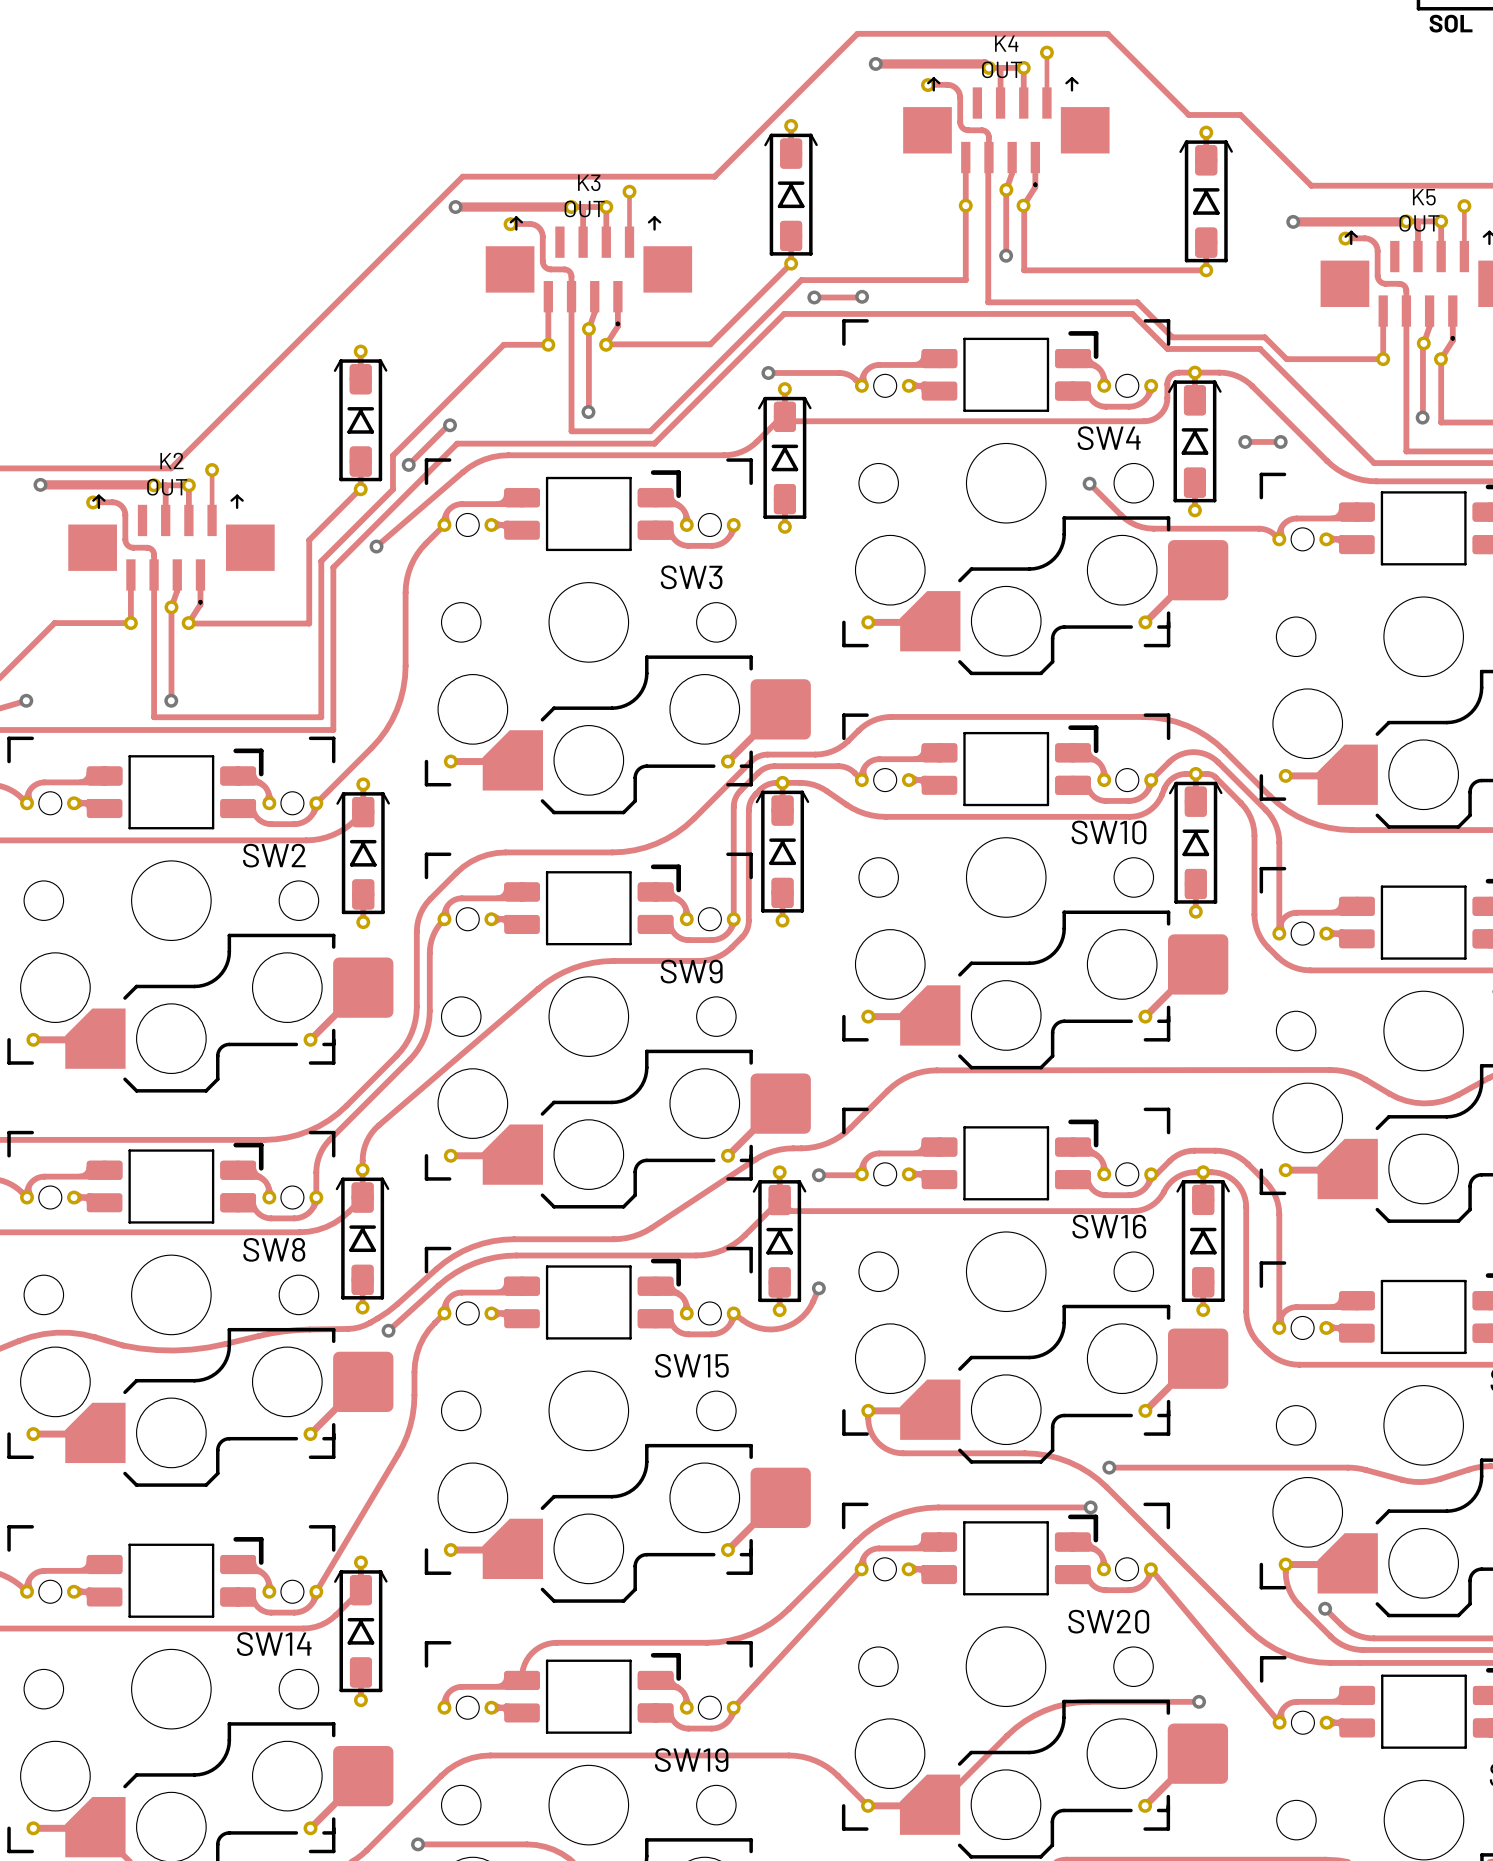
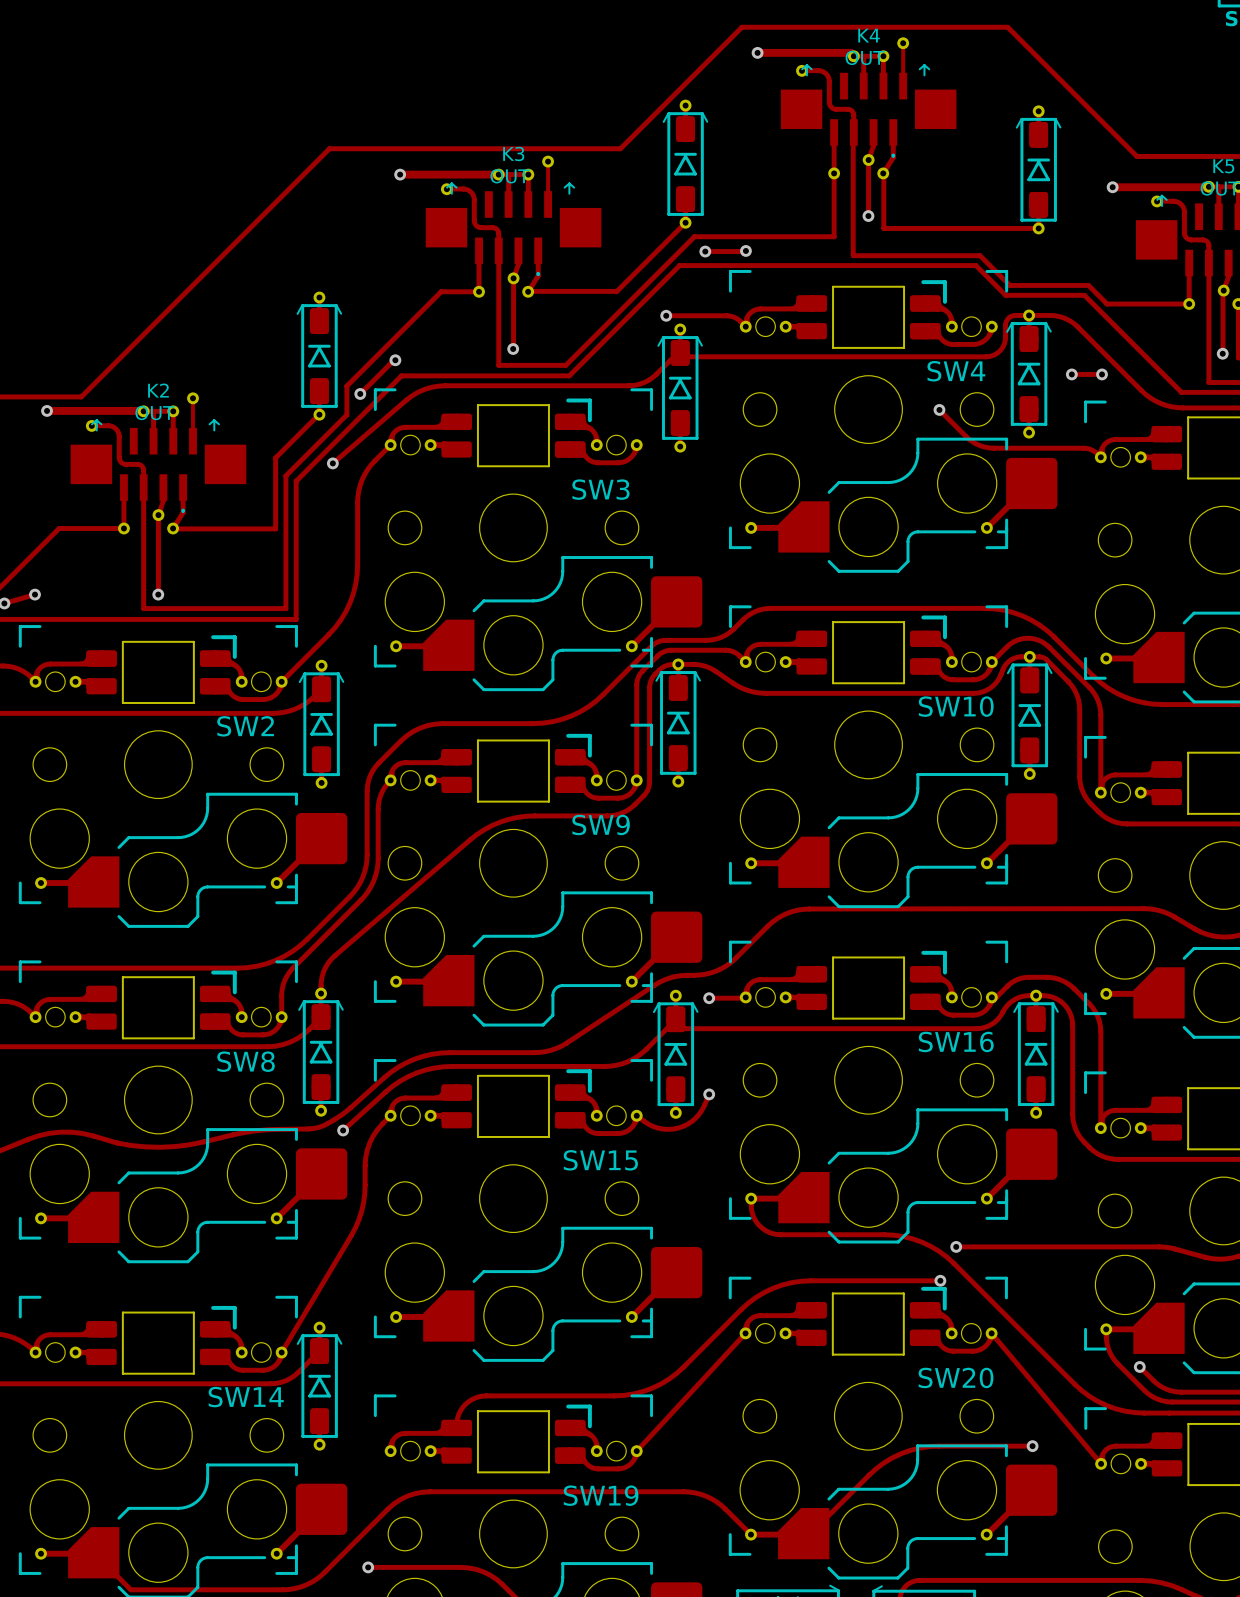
track: (1107, 33) (1188, 114) (1240, 114) (1311, 185) (1321, 185) -> (954, 27) (1007, 27) (1136, 156)
track: (462, 176) (171, 468) (80, 468) -> (406, 148) (329, 148) (81, 396)

